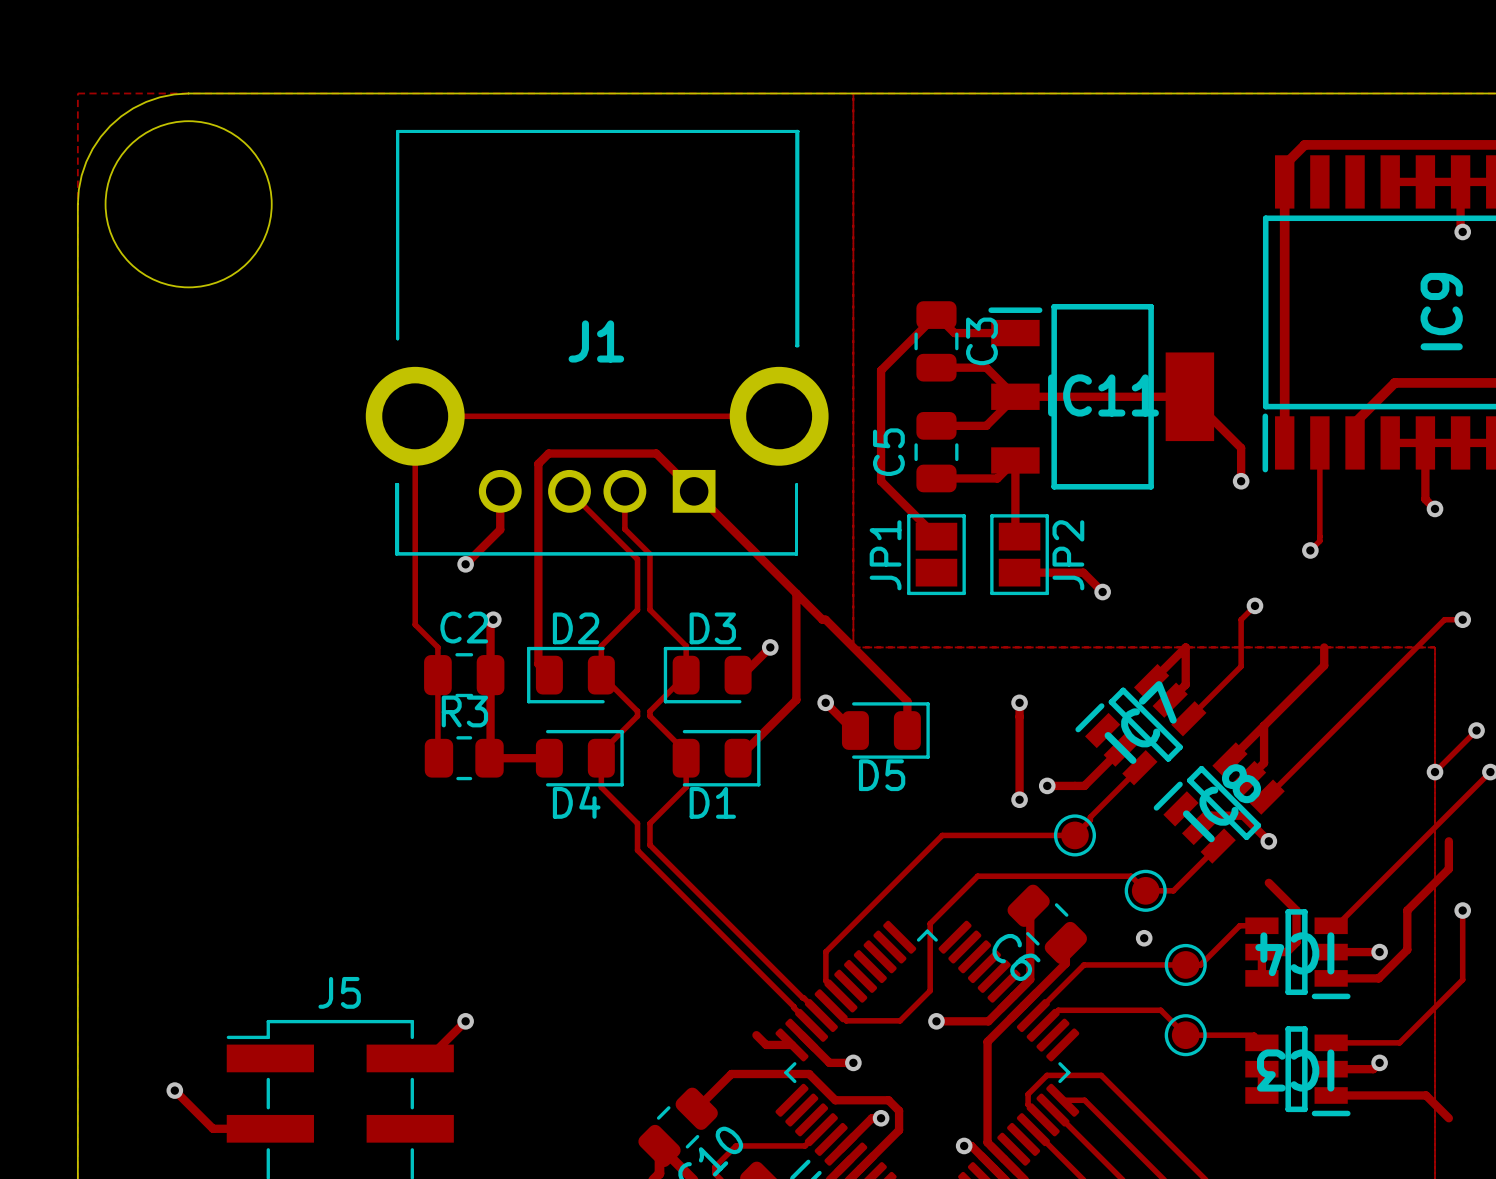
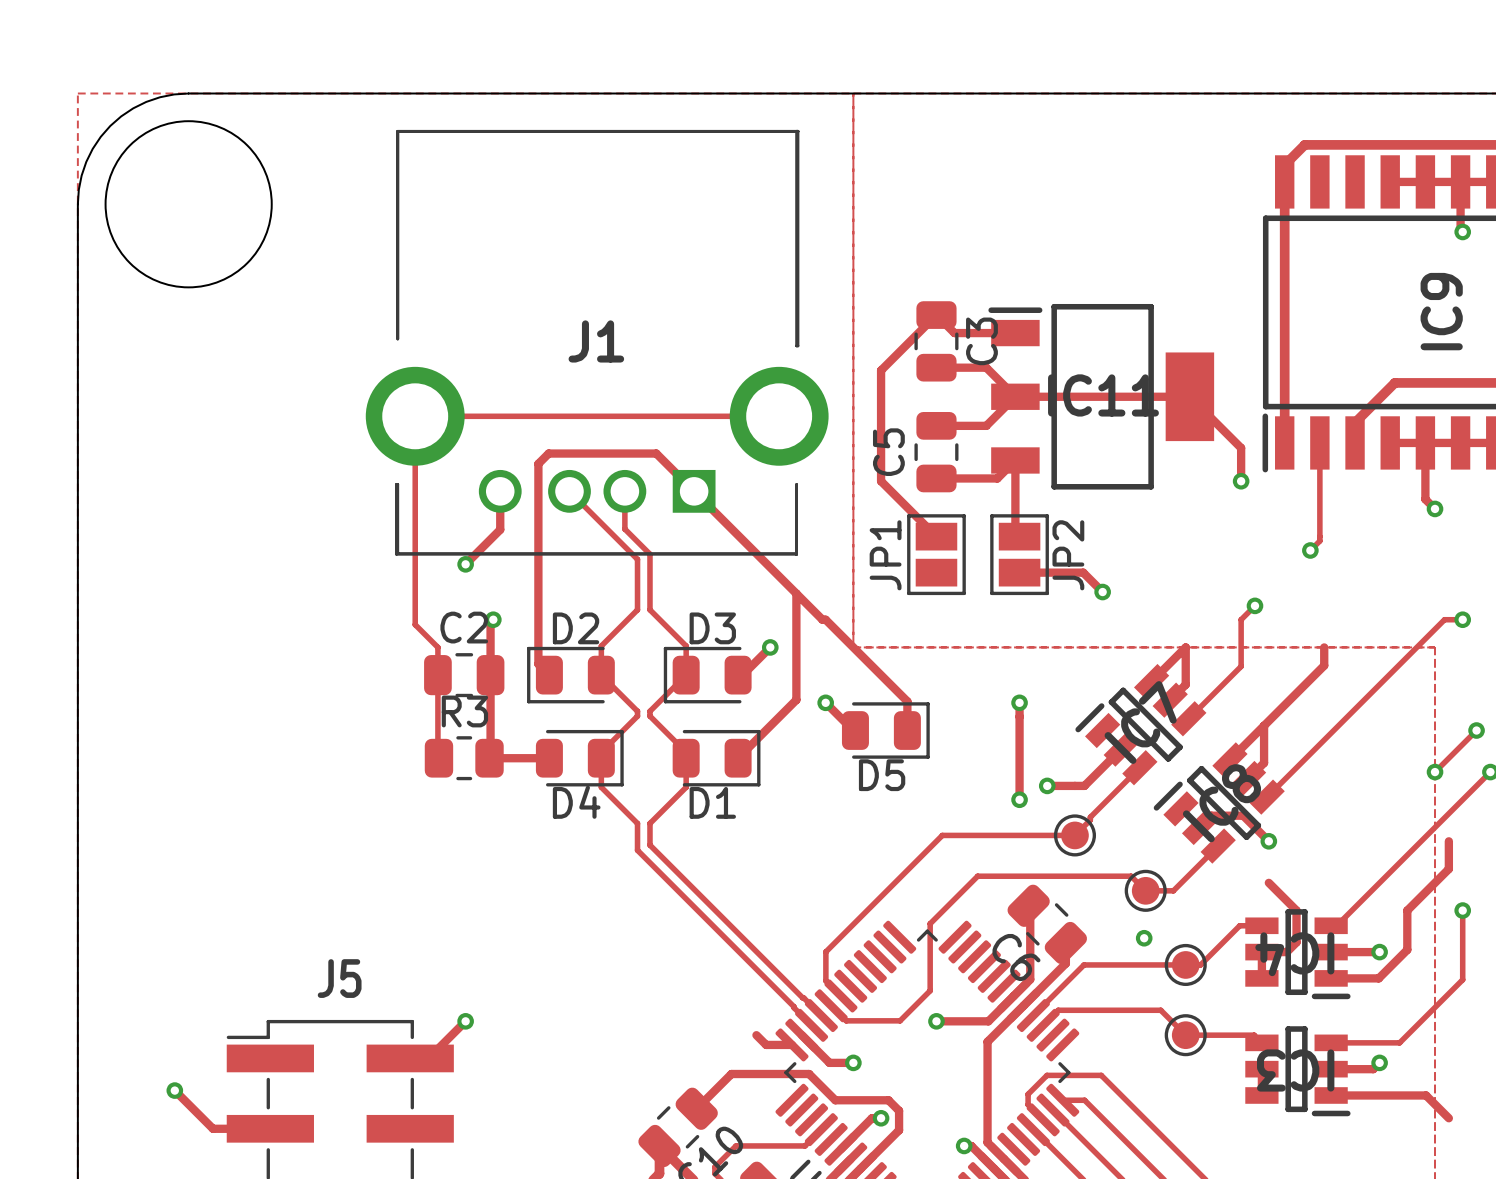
J5 name position: J5 (339, 992) -> J5 (339, 978)

